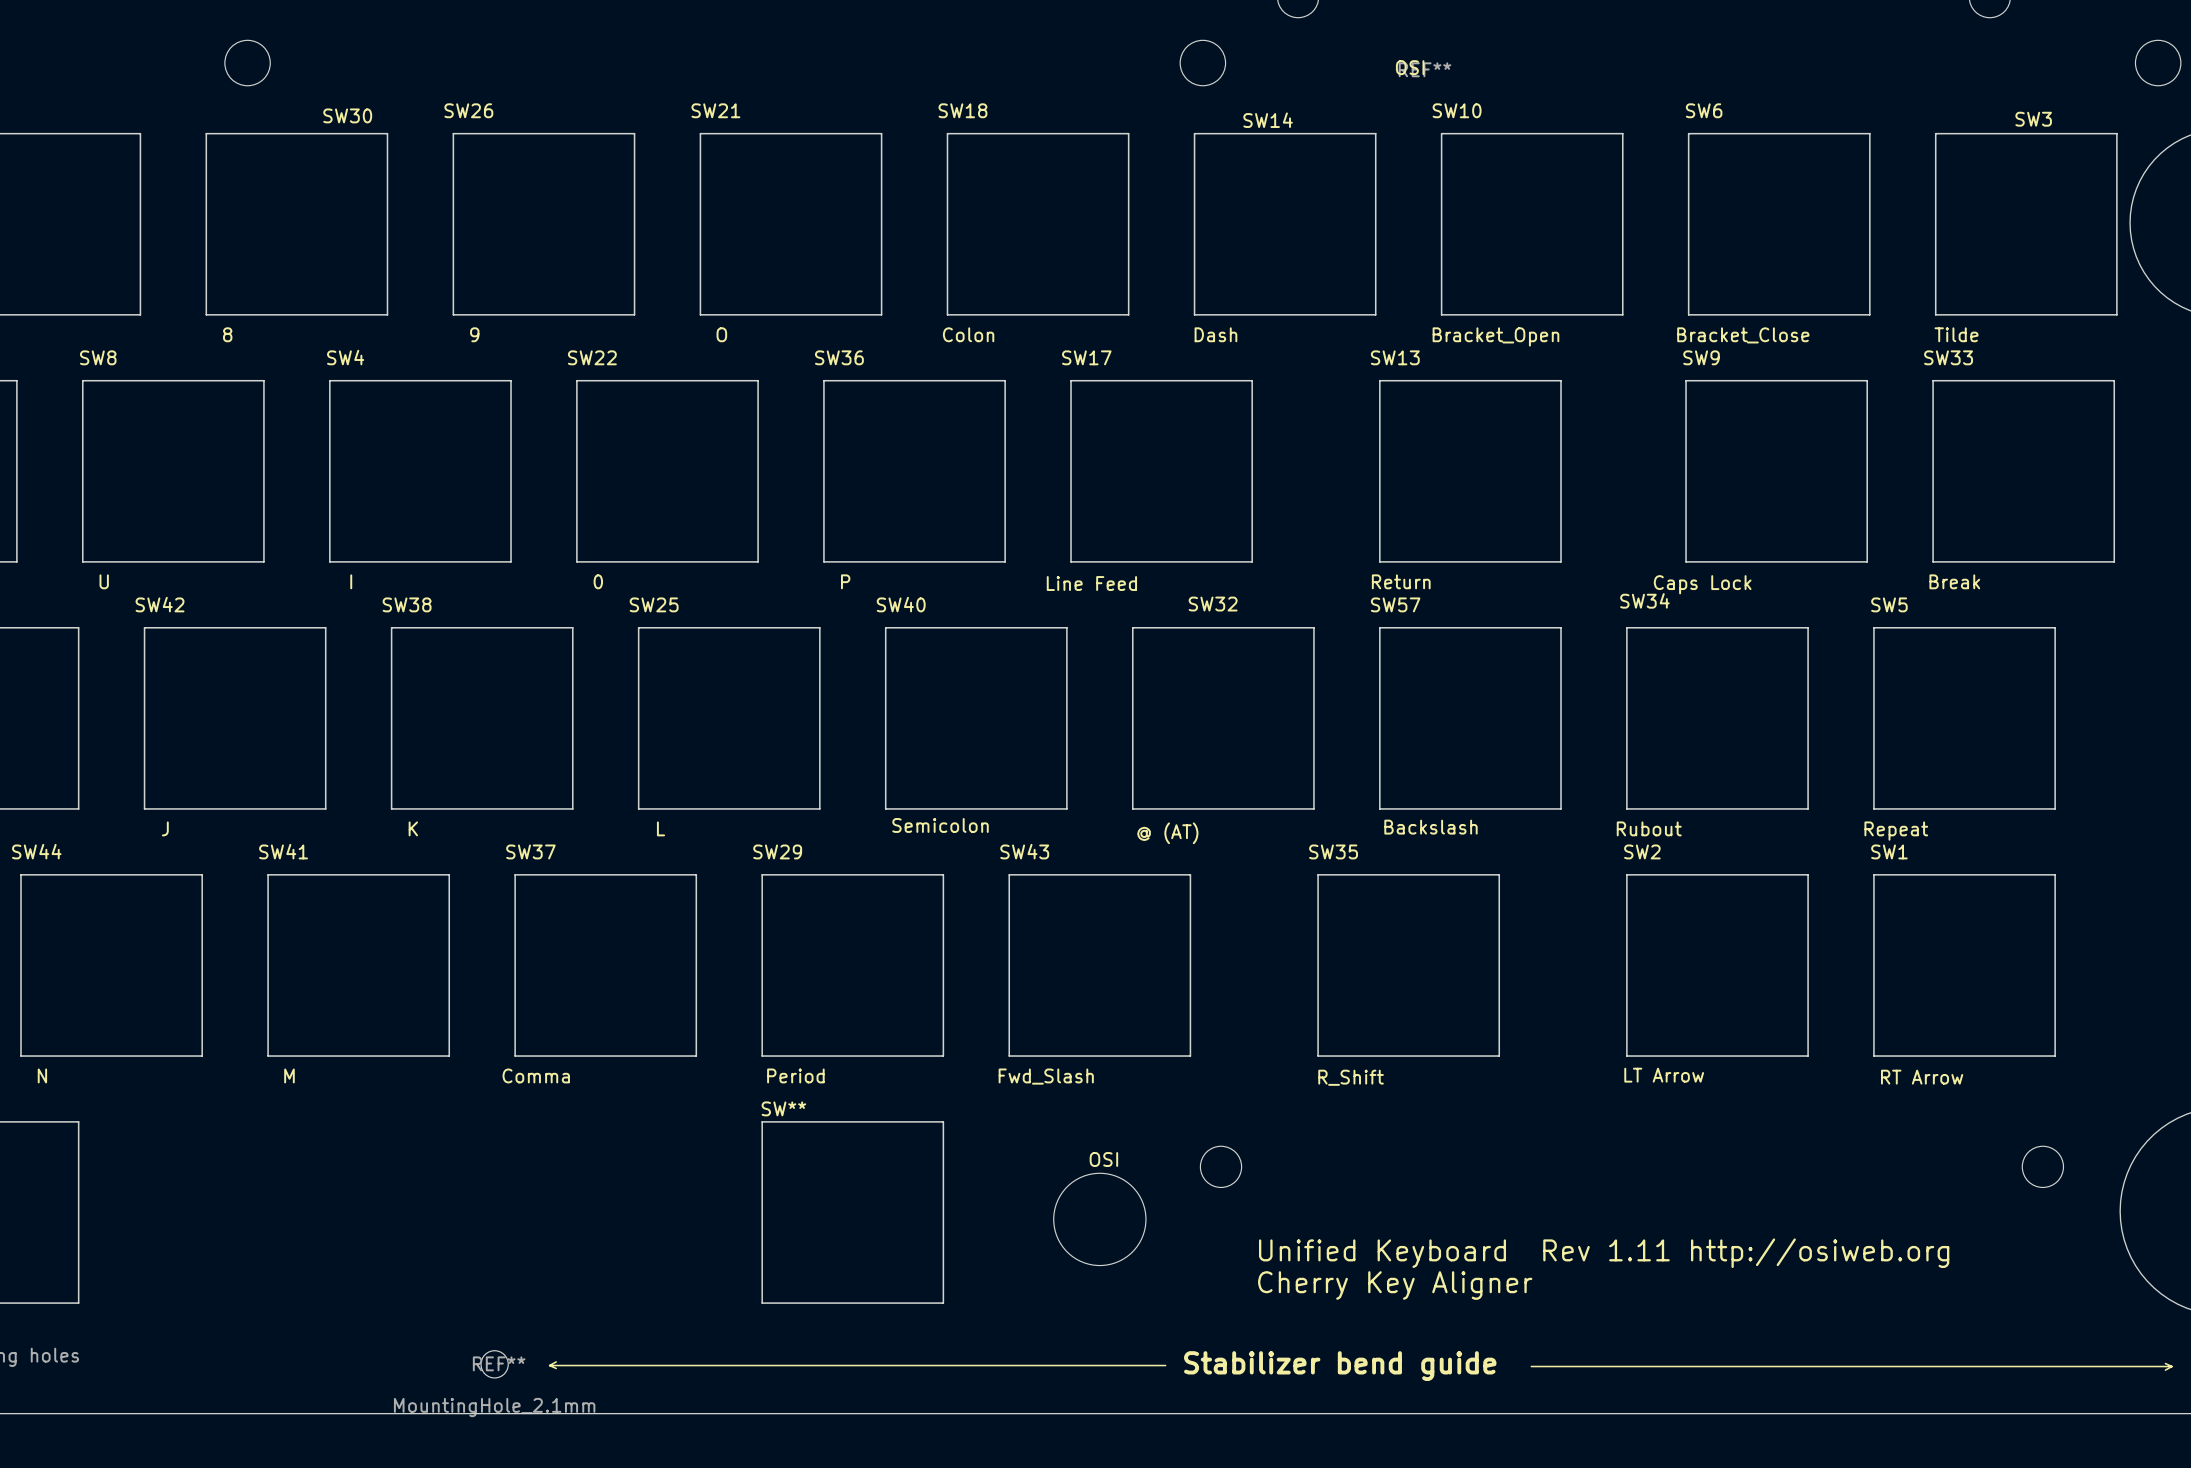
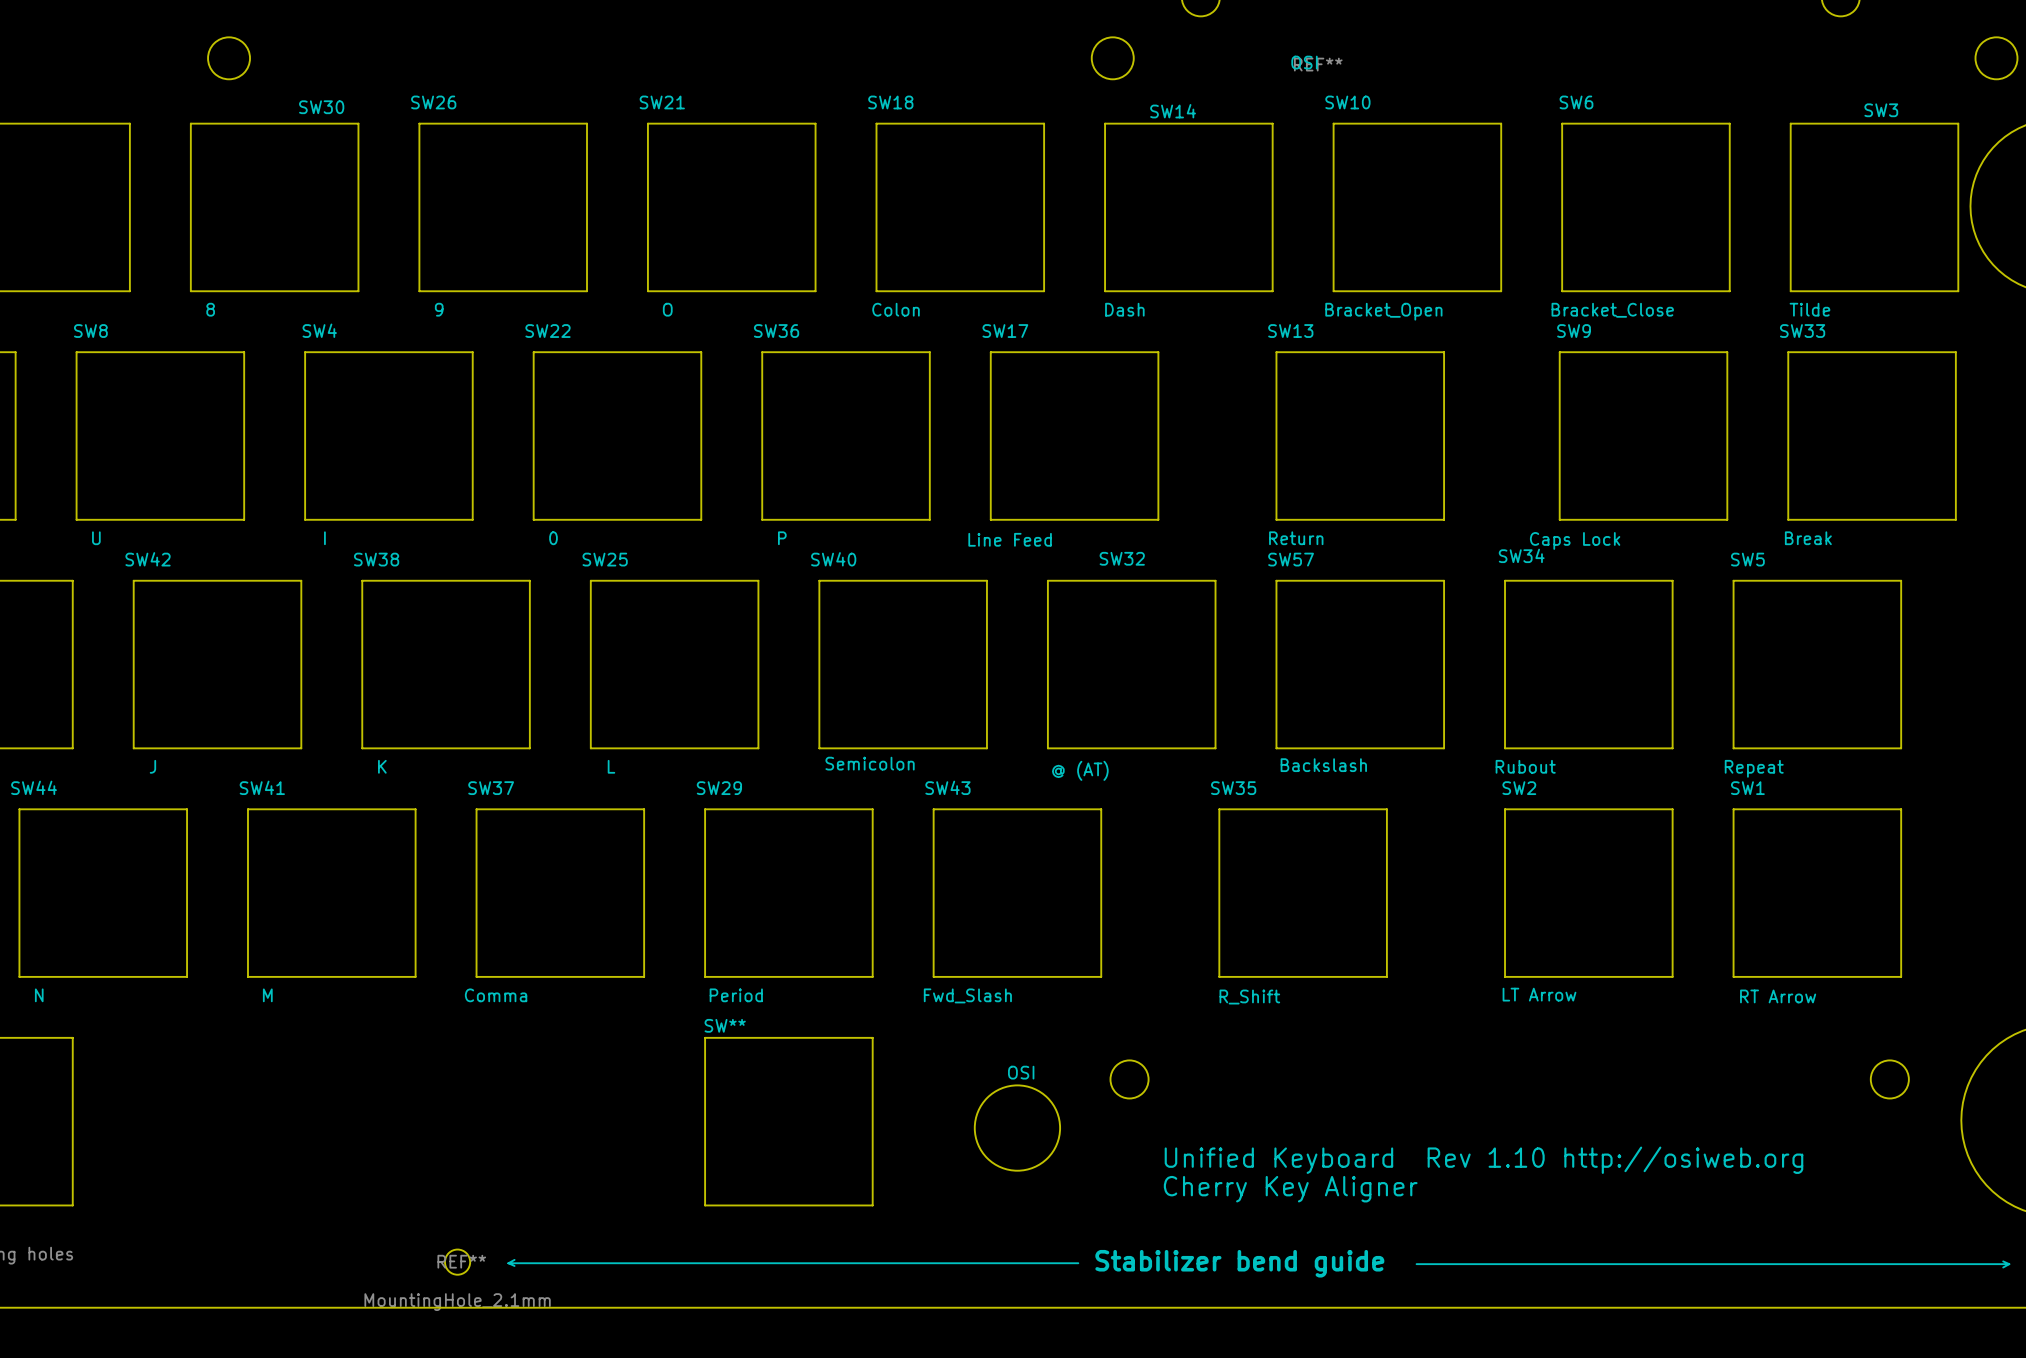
text: Unified Keyboard Rev 1.11 http://osiweb.org (1604, 1253) -> Unified Keyboard Rev 1.10 http://osiweb.org (1483, 1160)

